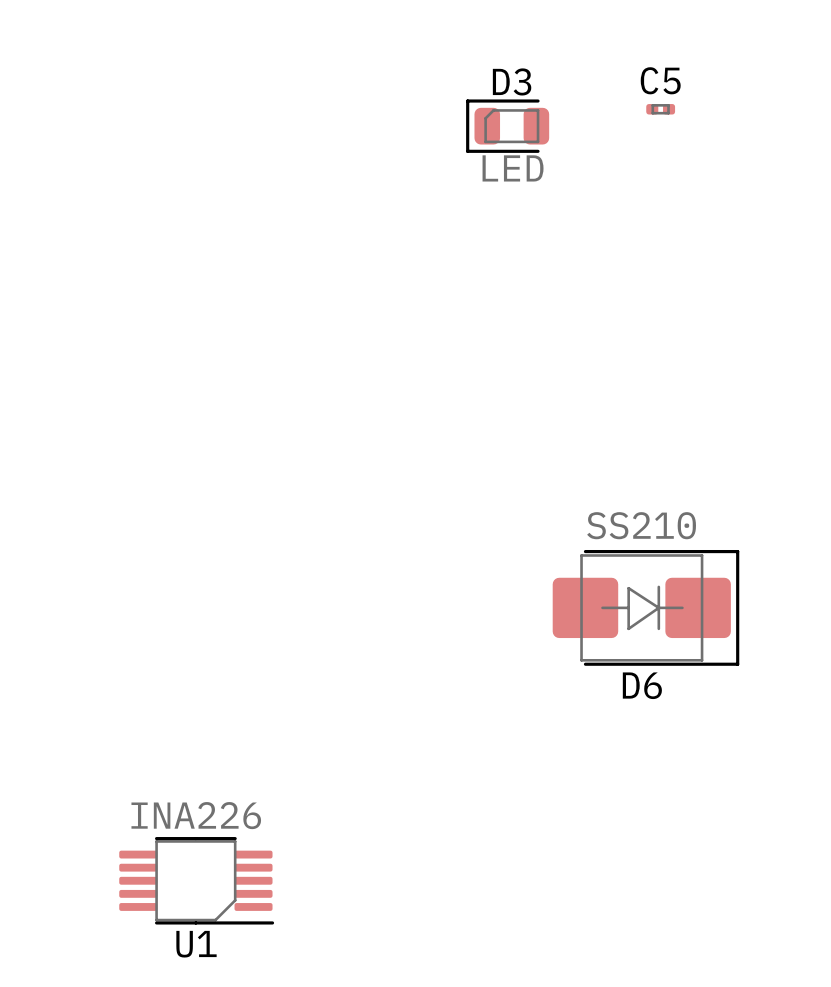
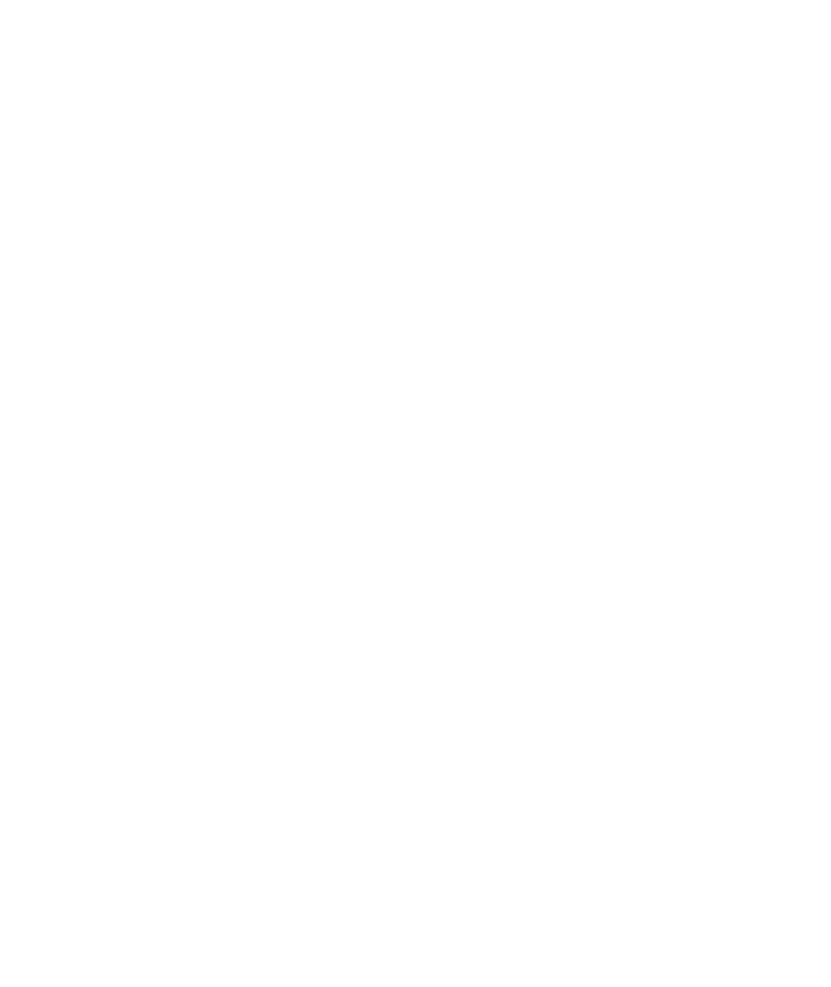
C5: (660, 109) -> none
D3: LED (507, 126) -> none
D6: SS210 (645, 607) -> none
U1: INA226 (196, 880) -> none

